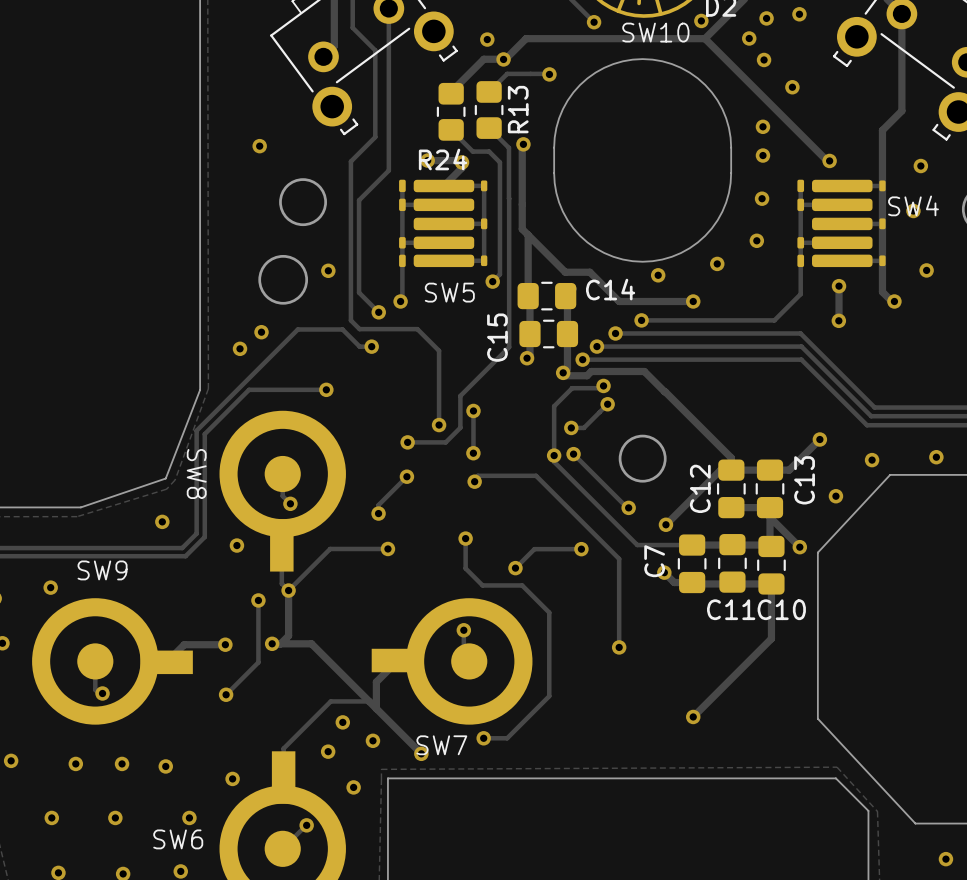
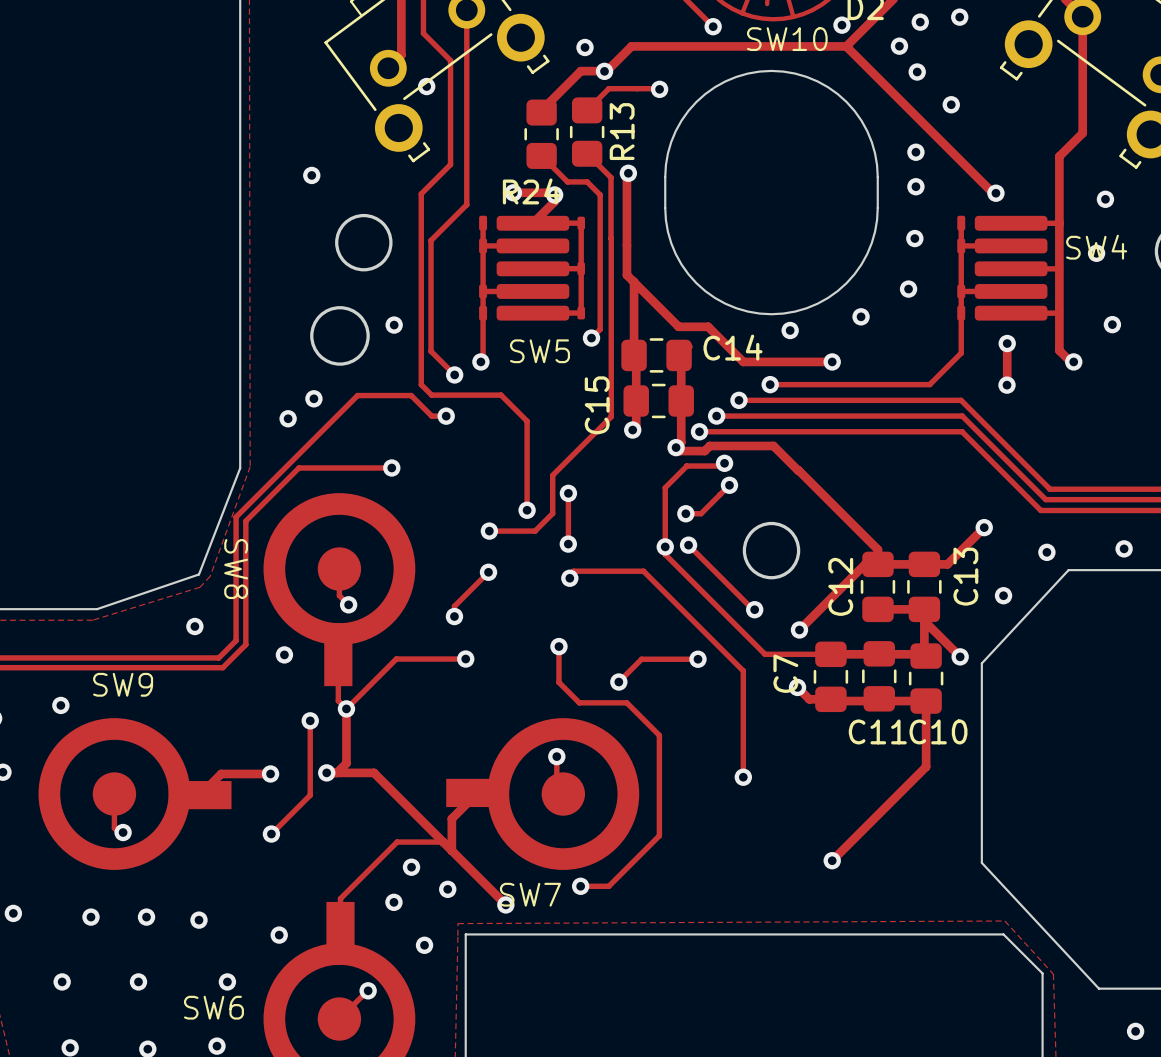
via: none -> (426, 86)

